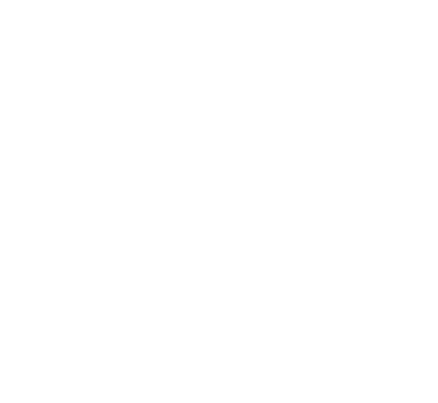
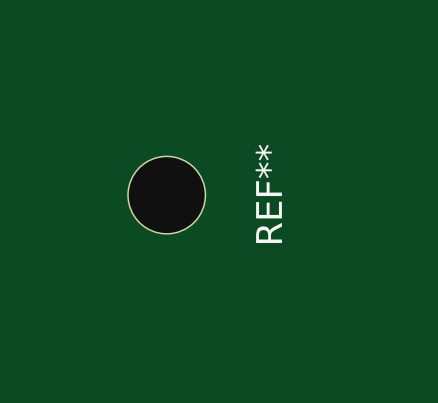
REF**: none -> (166, 195)

